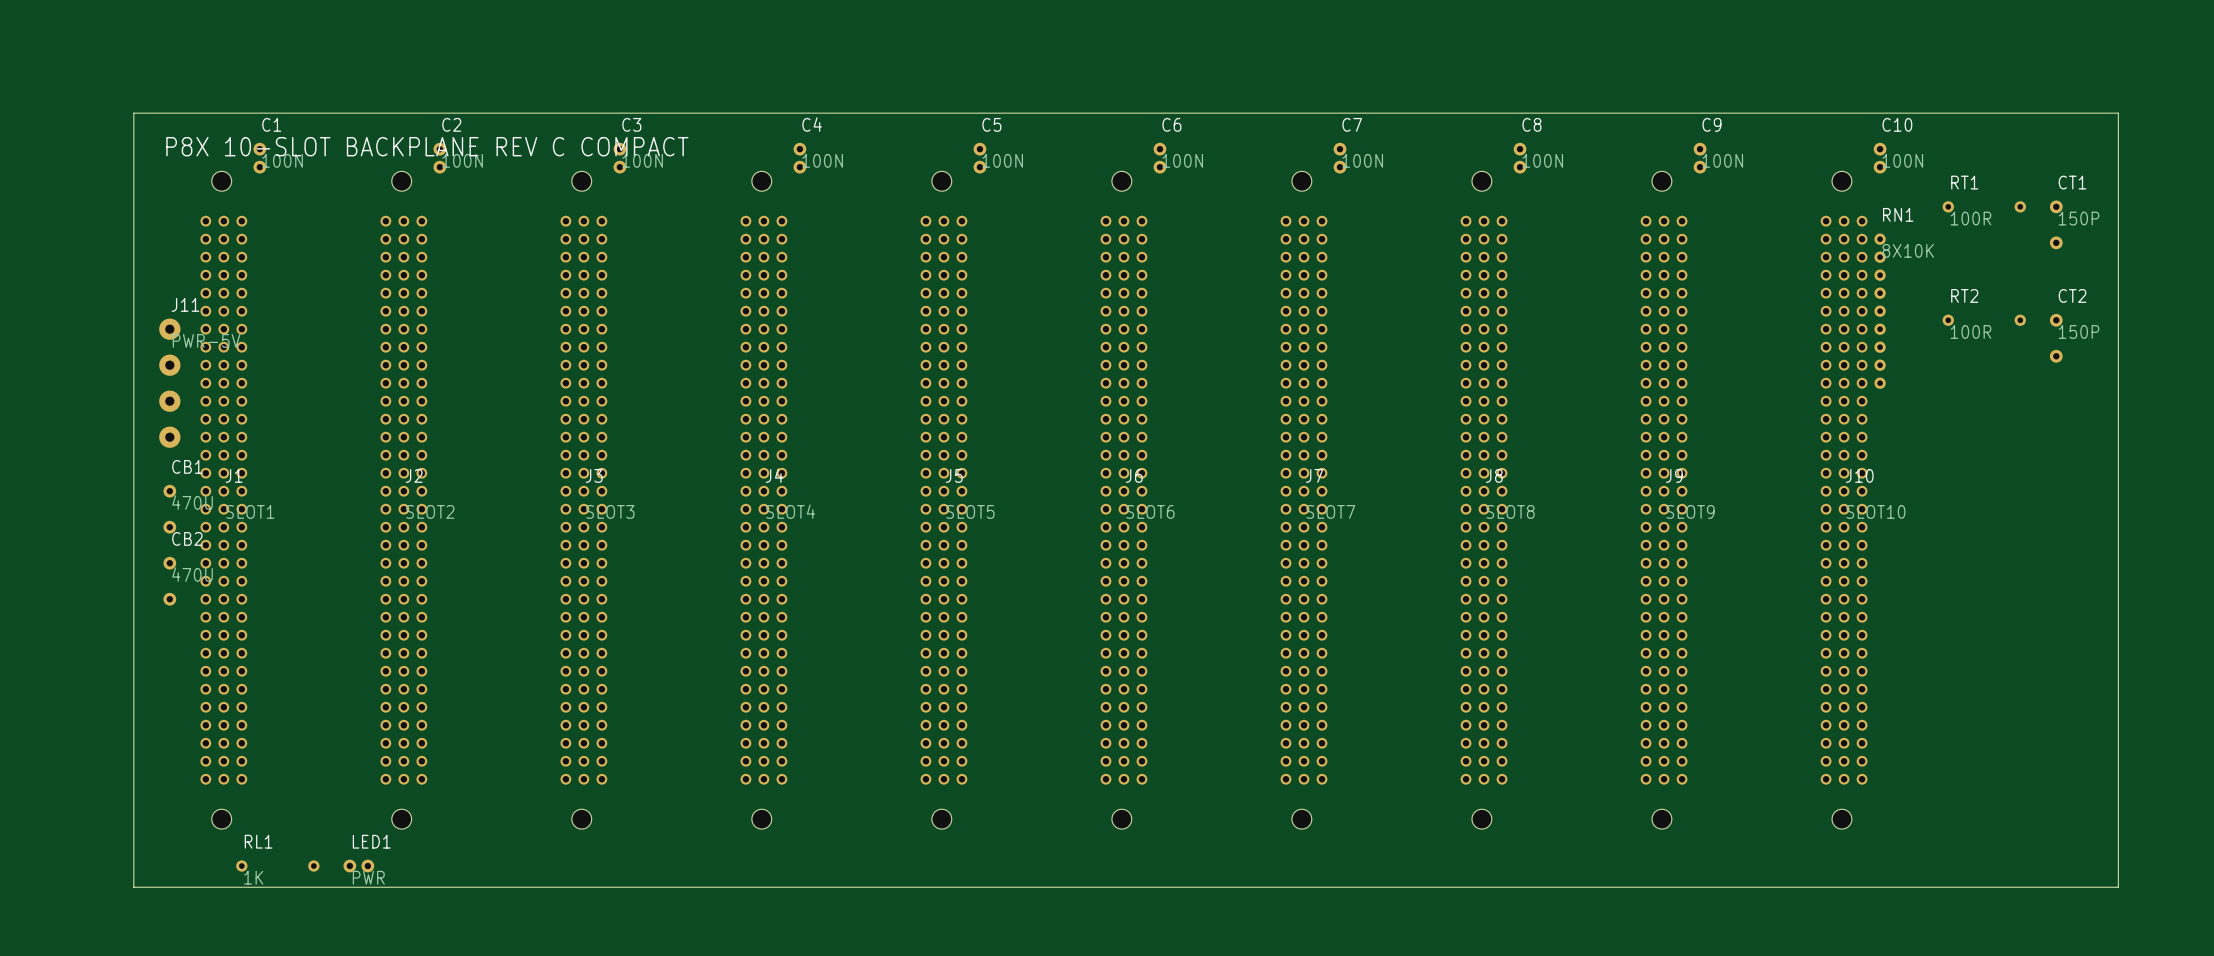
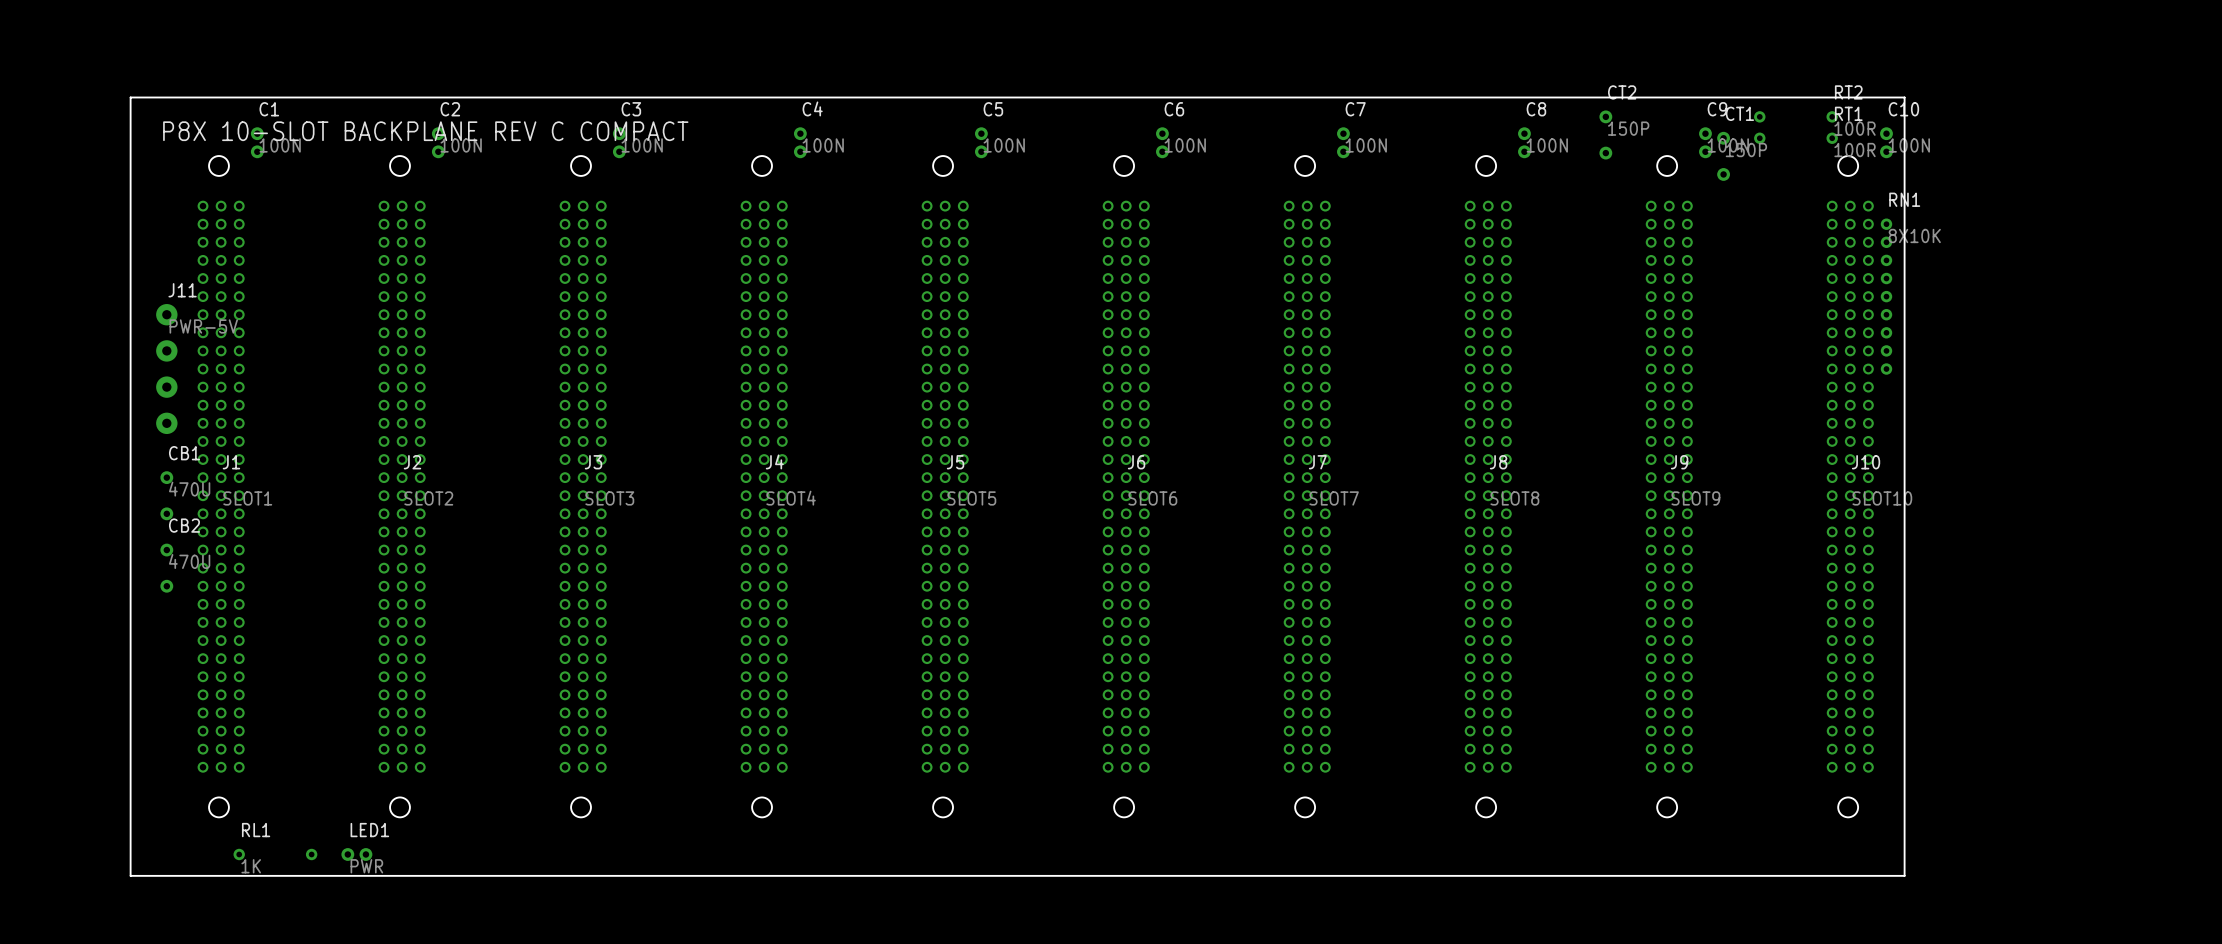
board edge: (1898, 113) (2118, 113) (2118, 887) (1898, 887) -> (1904, 97) (1904, 875)
RT1 name position: RT1 (1964, 182) -> RT1 (1848, 113)
RT1 position: (1984, 206) -> (1795, 138)
RT1 value position: 100R (1970, 218) -> 100R (1855, 150)
CT1 position: (2056, 224) -> (1723, 156)
RT2 name position: RT2 (1964, 295) -> RT2 (1848, 92)
RT2 position: (1984, 320) -> (1795, 116)
RT2 value position: 100R (1970, 331) -> 100R (1855, 128)
CT2 position: (2056, 338) -> (1605, 134)

